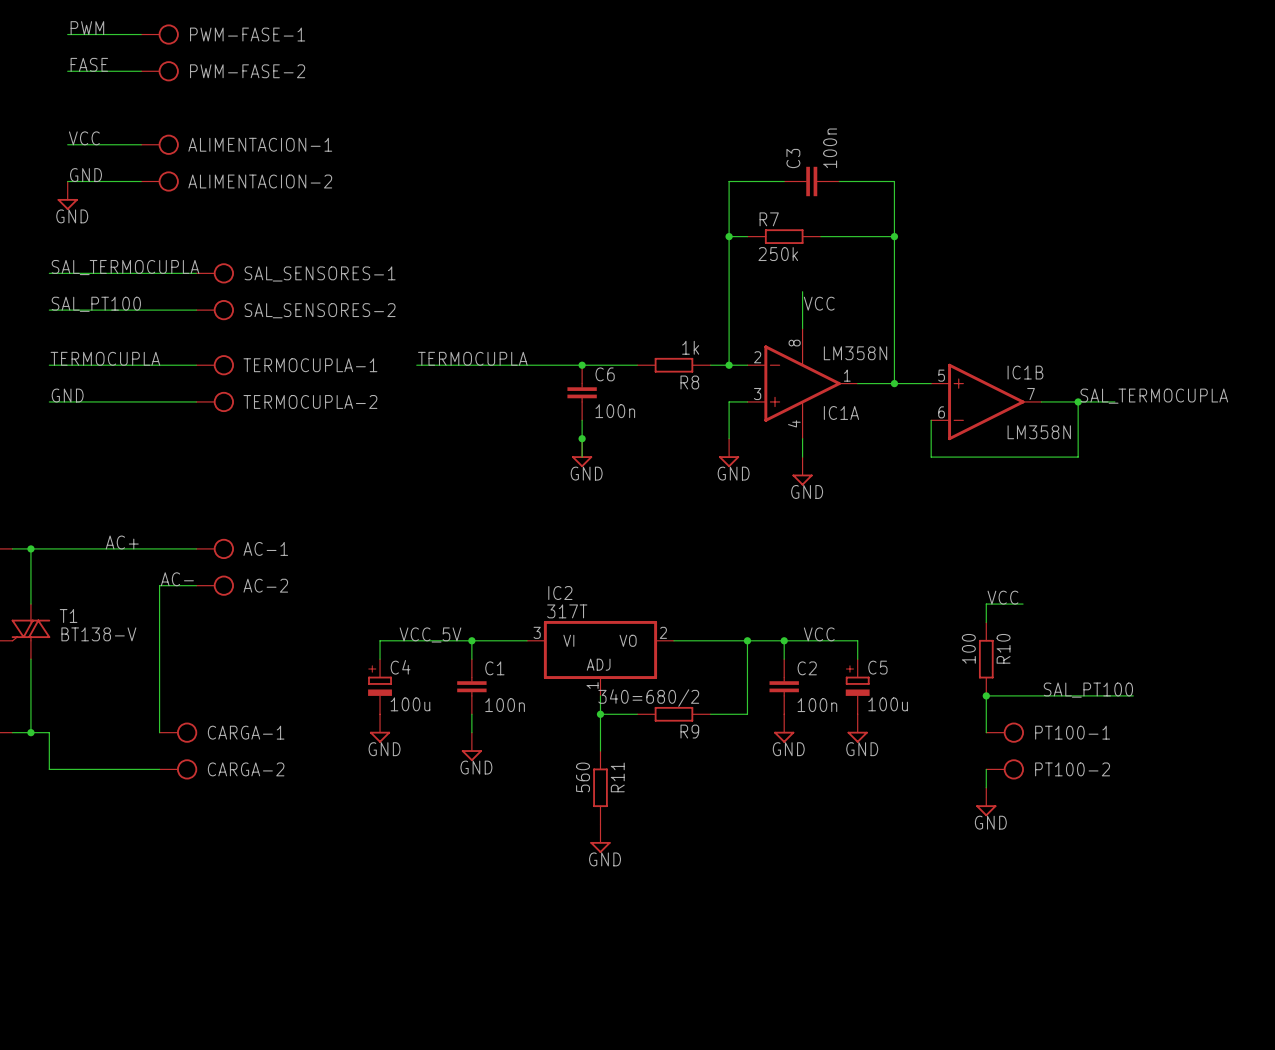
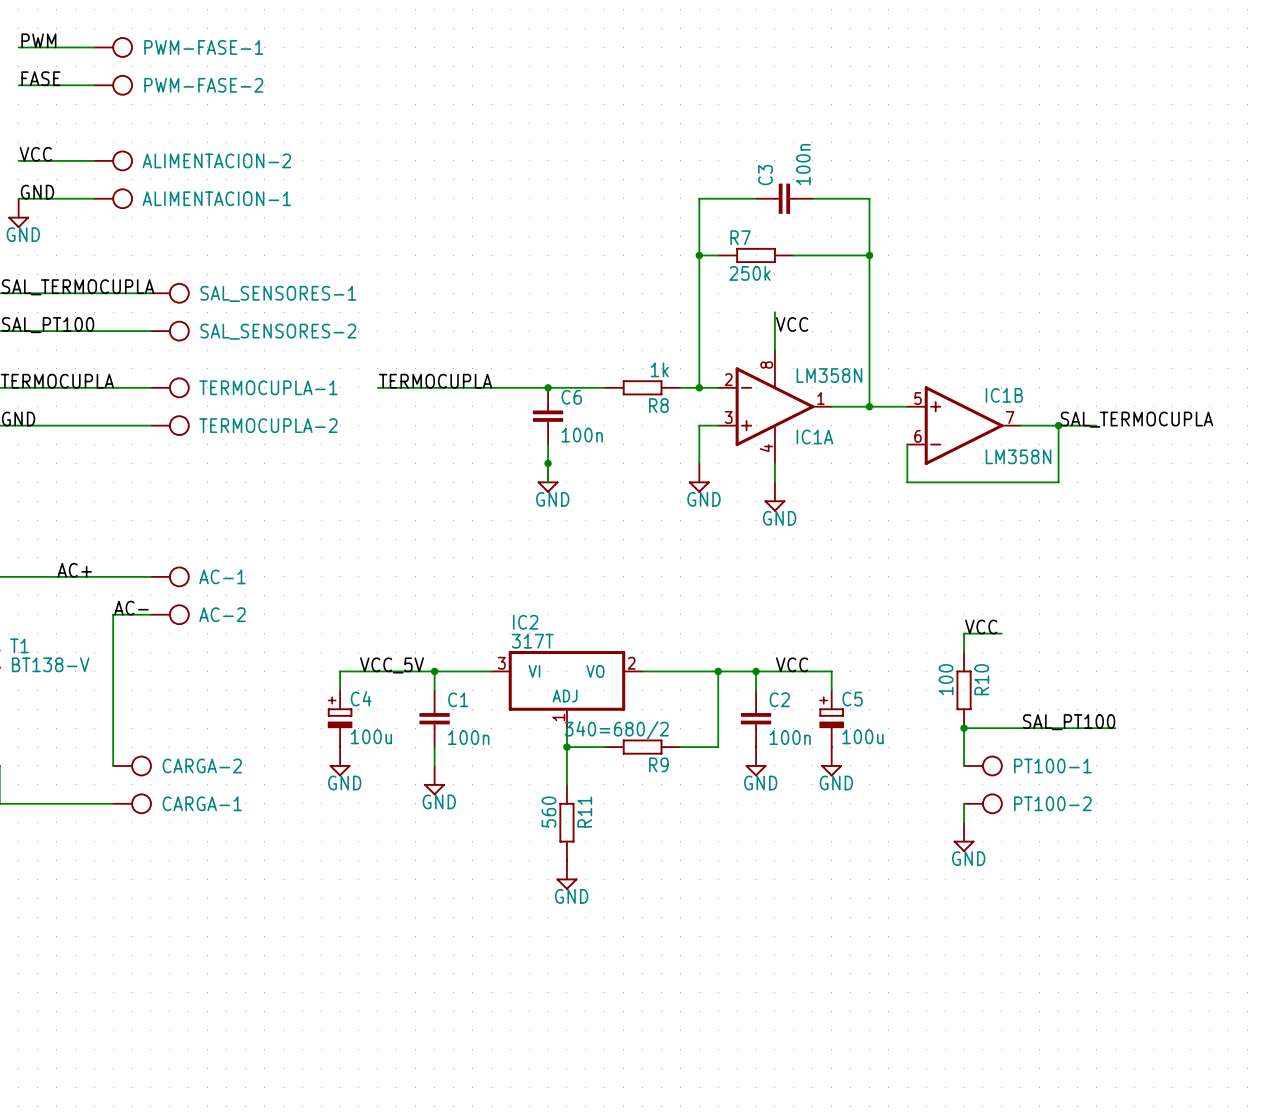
ALIMENTACION-1 name: ALIMENTACION-1 (260, 144) -> ALIMENTACION-2 (216, 160)
ALIMENTACION-2 name: ALIMENTACION-2 (260, 181) -> ALIMENTACION-1 (216, 198)
CARGA-1 name: CARGA-1 (246, 732) -> CARGA-2 (202, 765)
CARGA-2 name: CARGA-2 (246, 769) -> CARGA-1 (202, 803)

